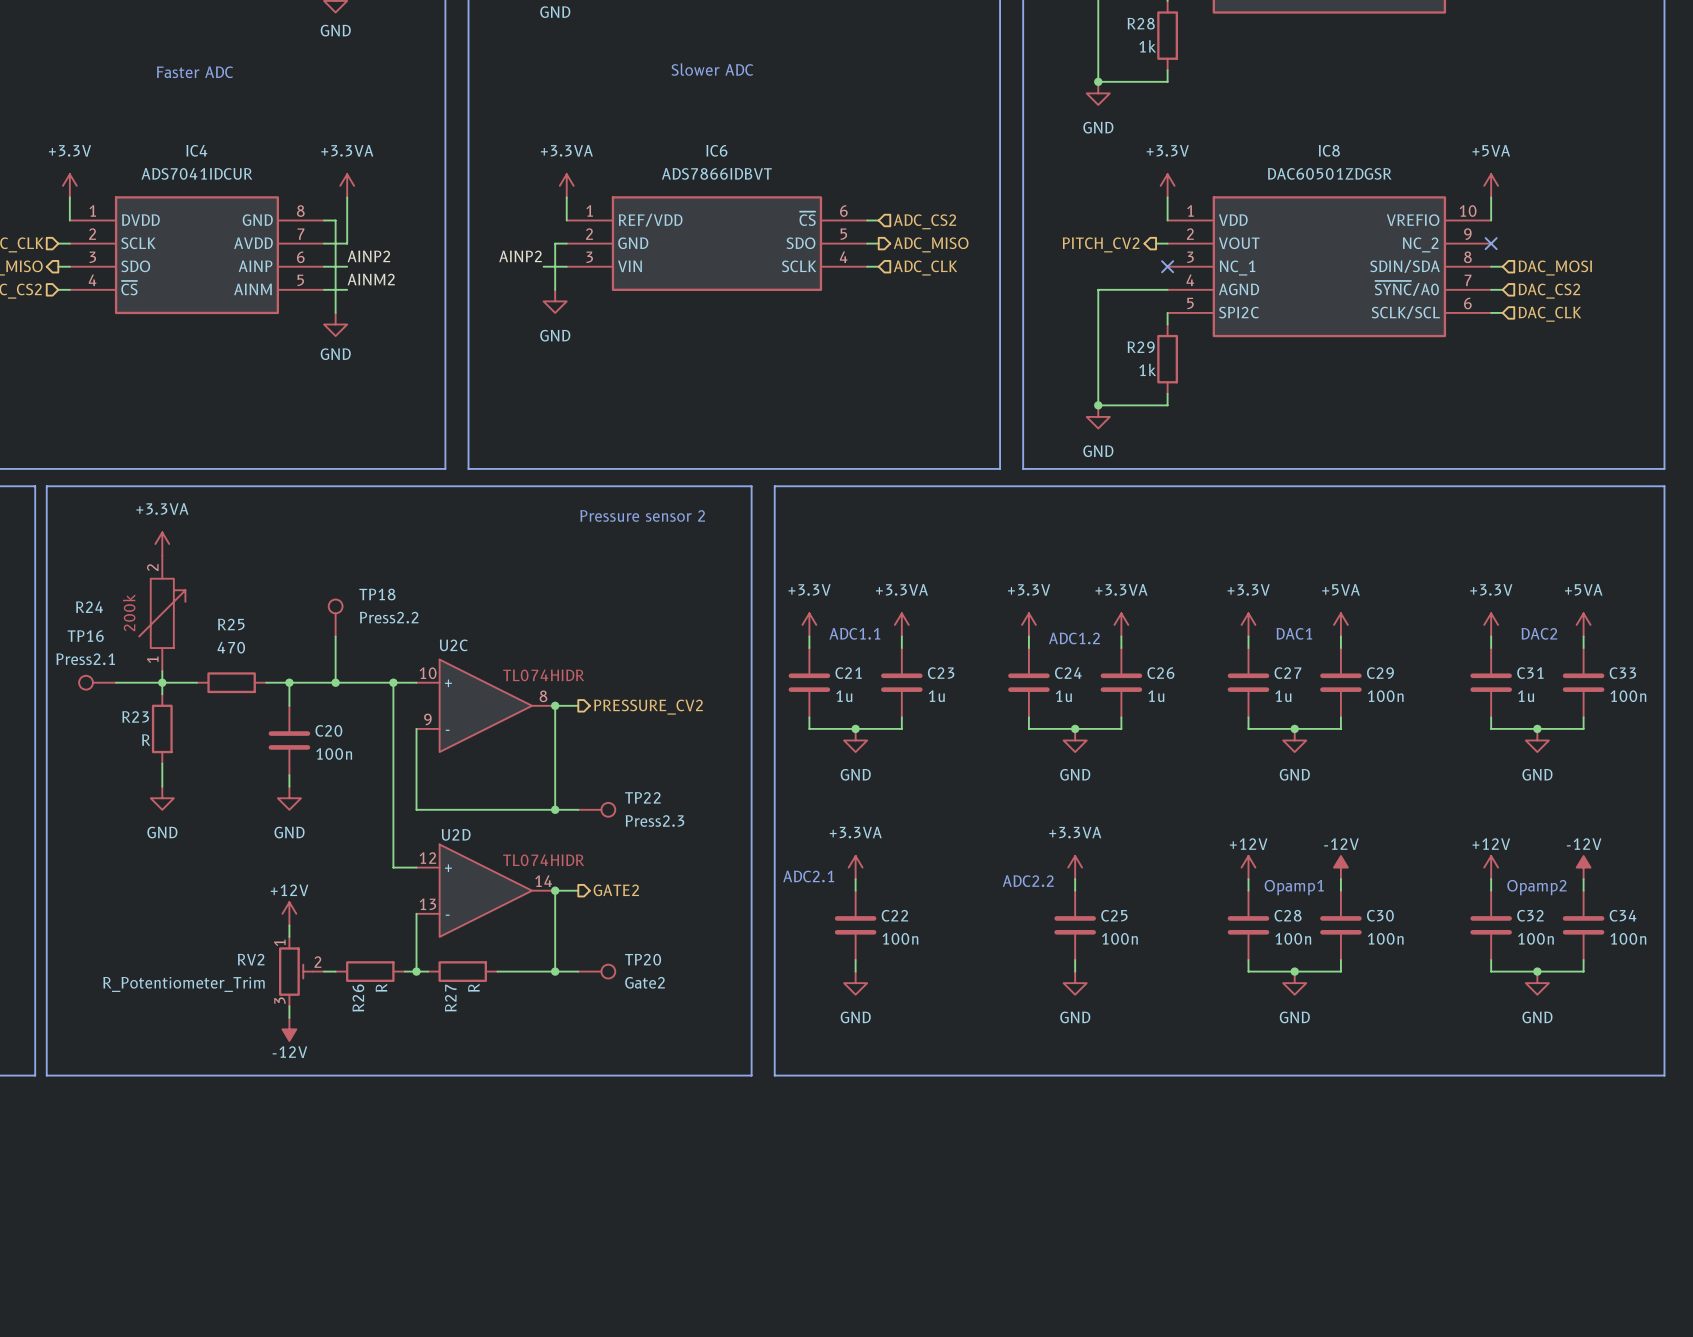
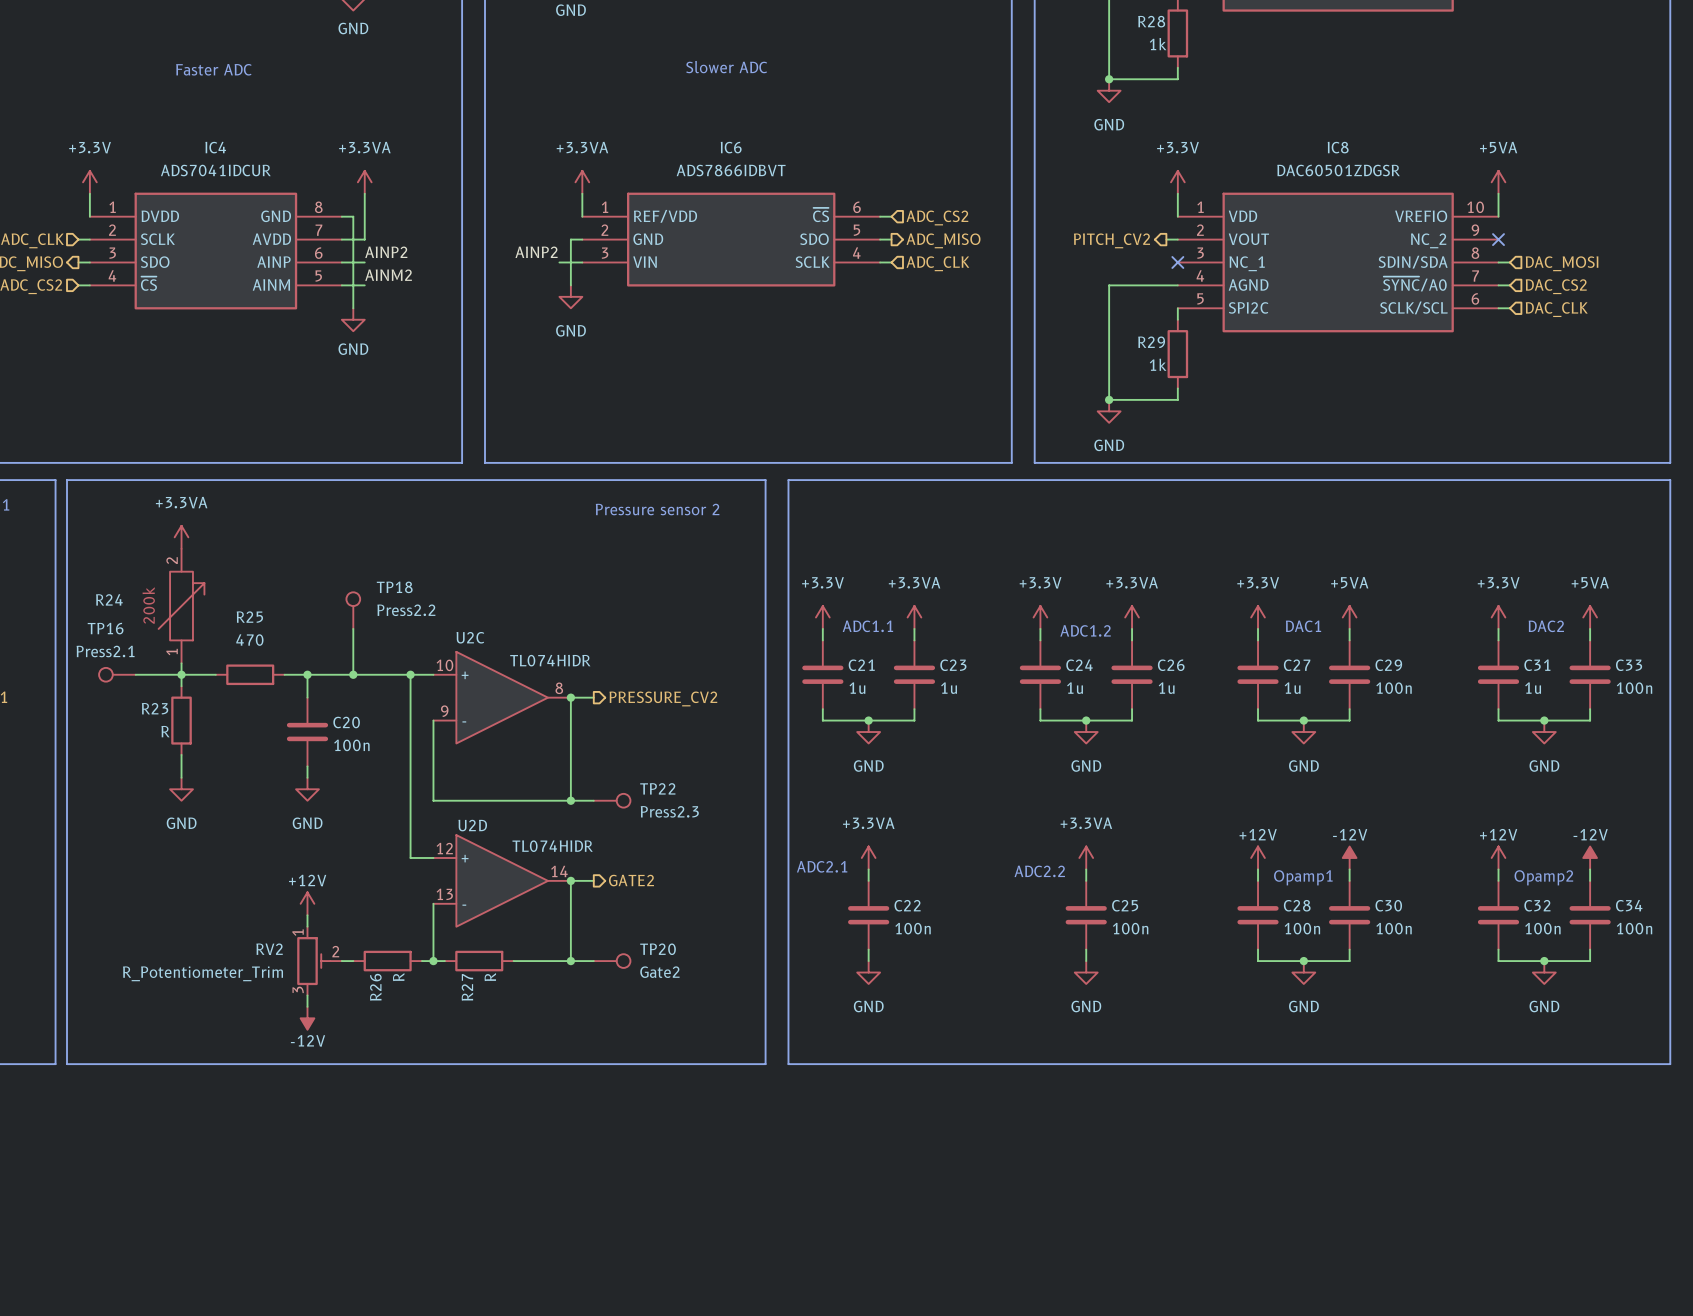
U2C value: none -> TL074HIDR (550, 660)
U2C text: TL074HIDR (543, 675) -> none
U2D value: none -> TL074HIDR (552, 846)
U2D text: TL074HIDR (543, 860) -> none

